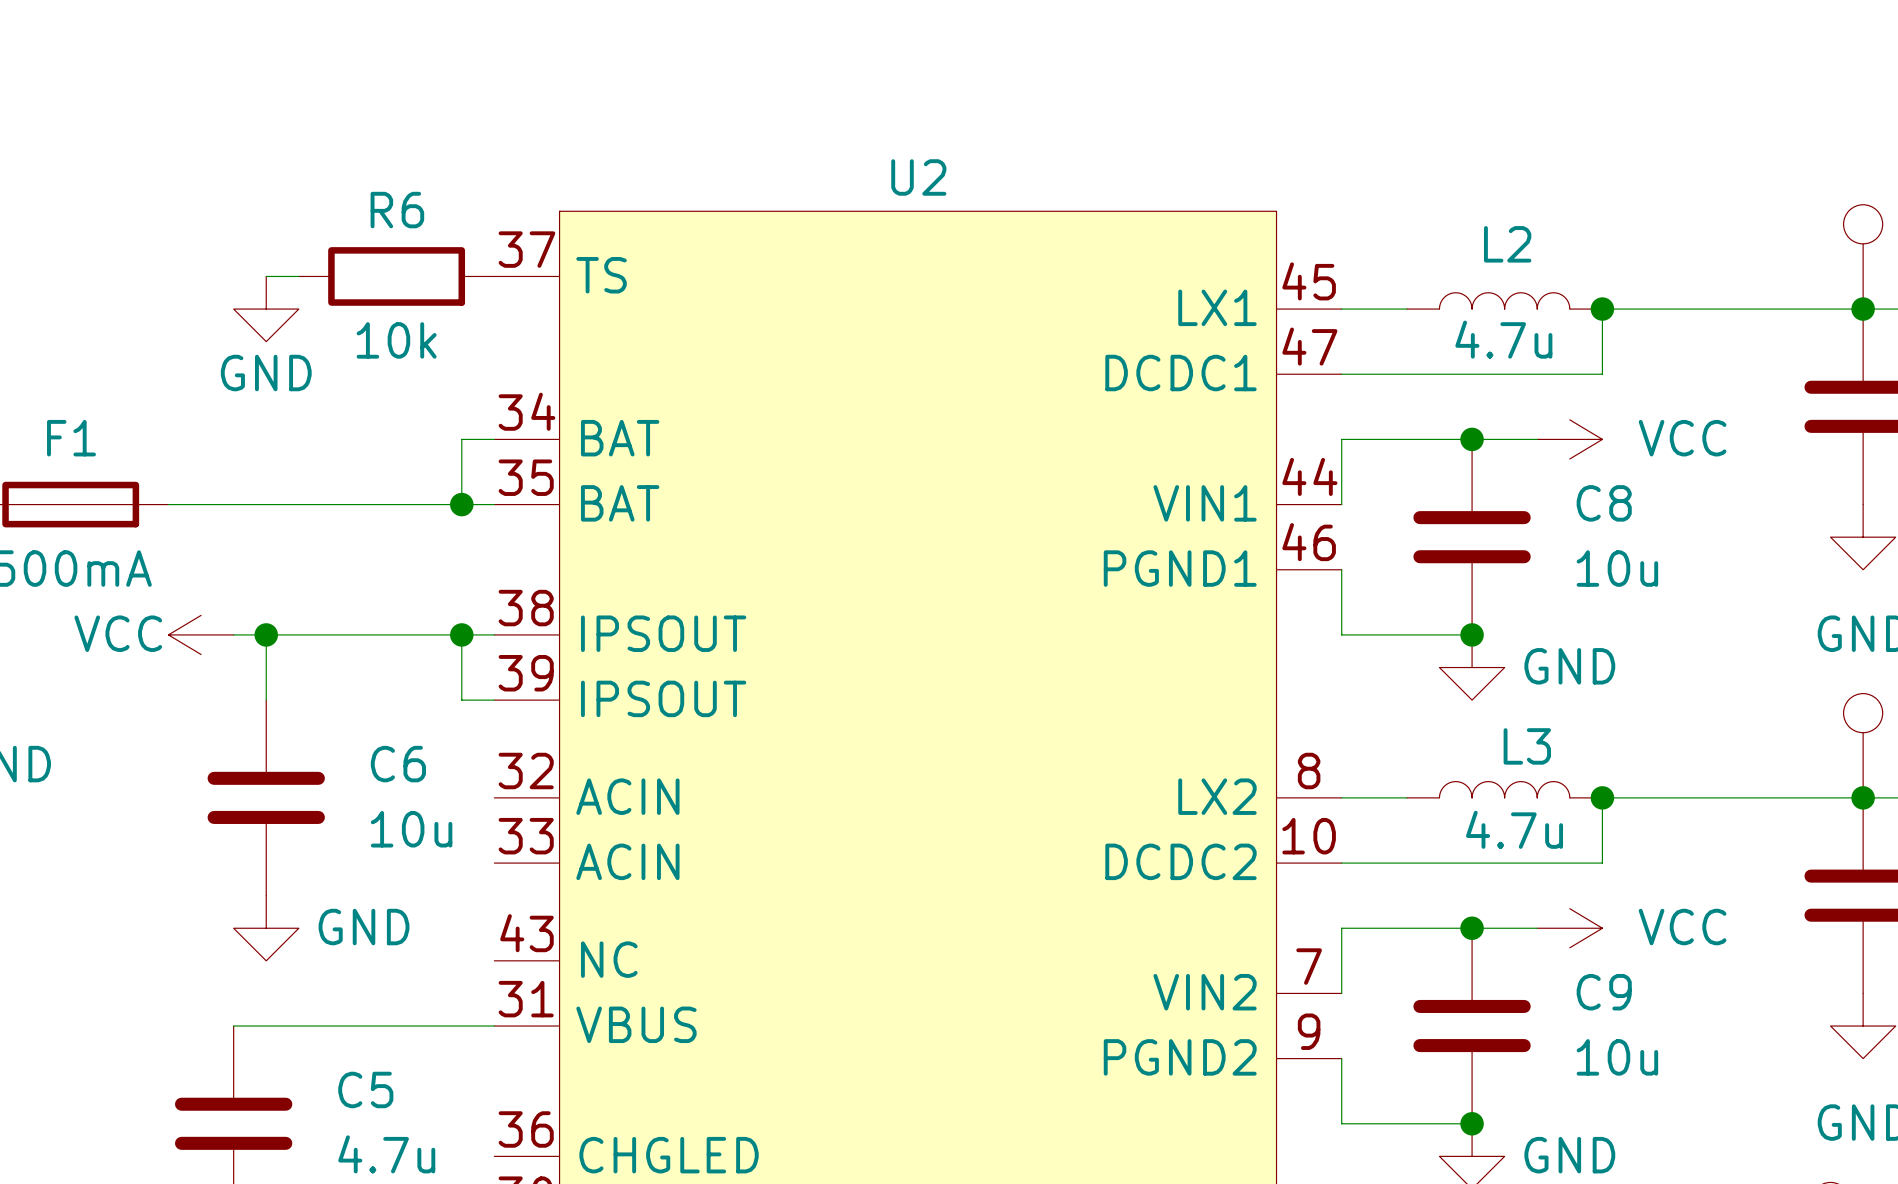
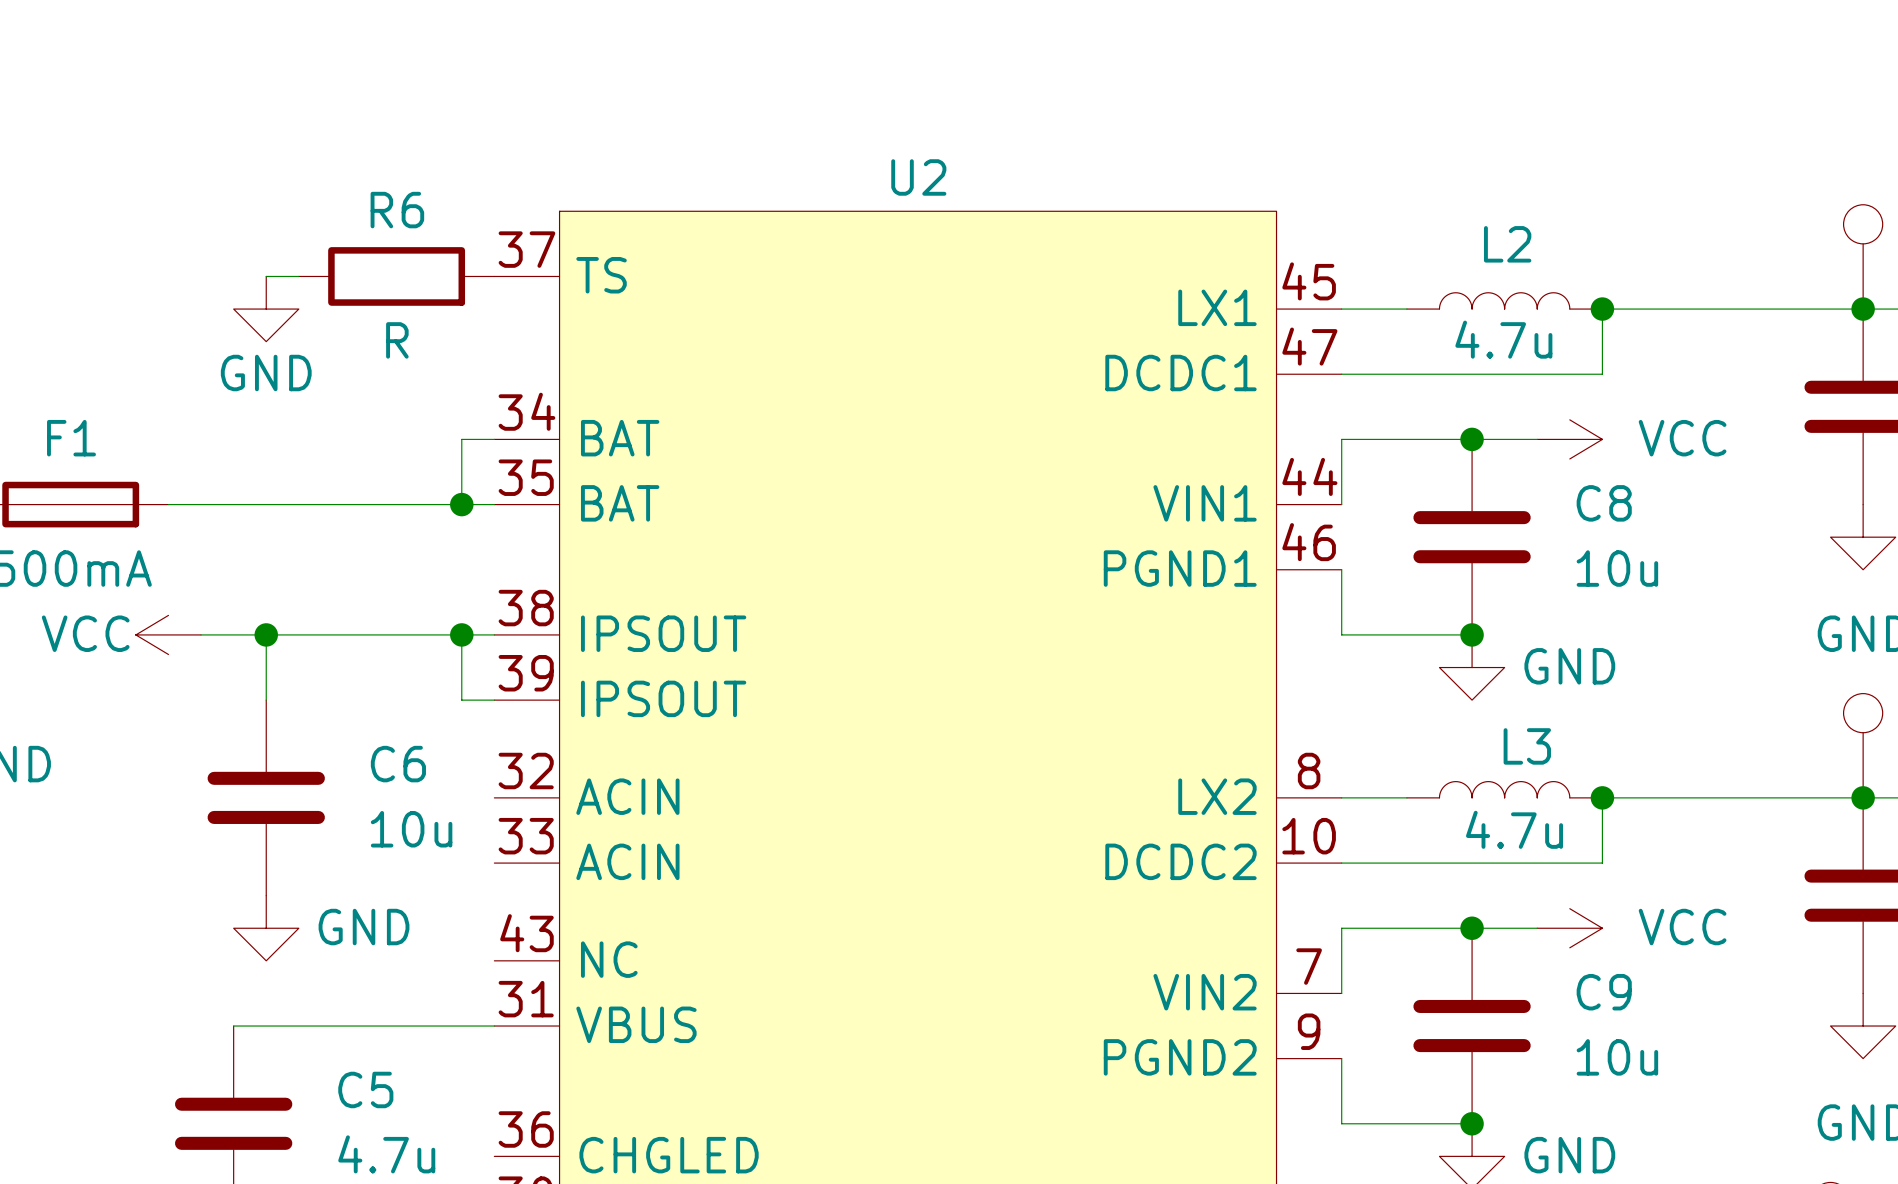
R6 value: 10k (396, 340) -> R (397, 340)
power symbol position: VCC (201, 634) -> VCC (168, 634)

